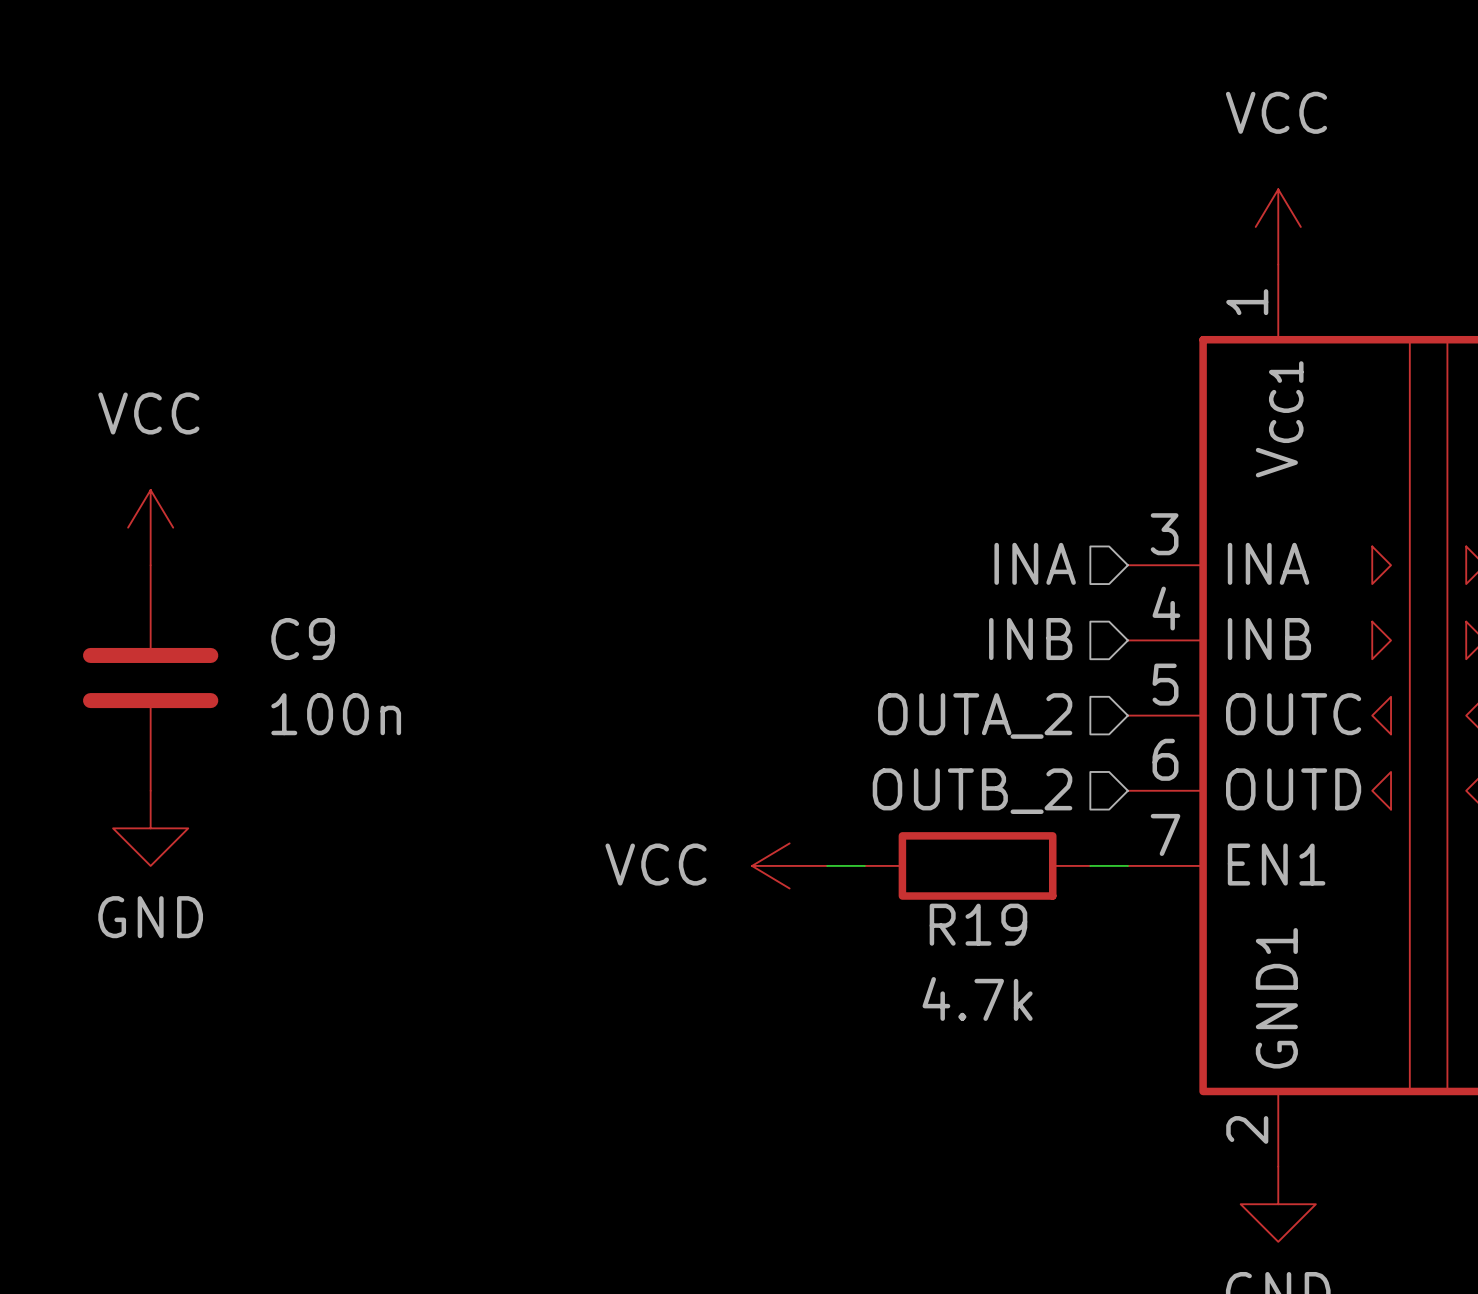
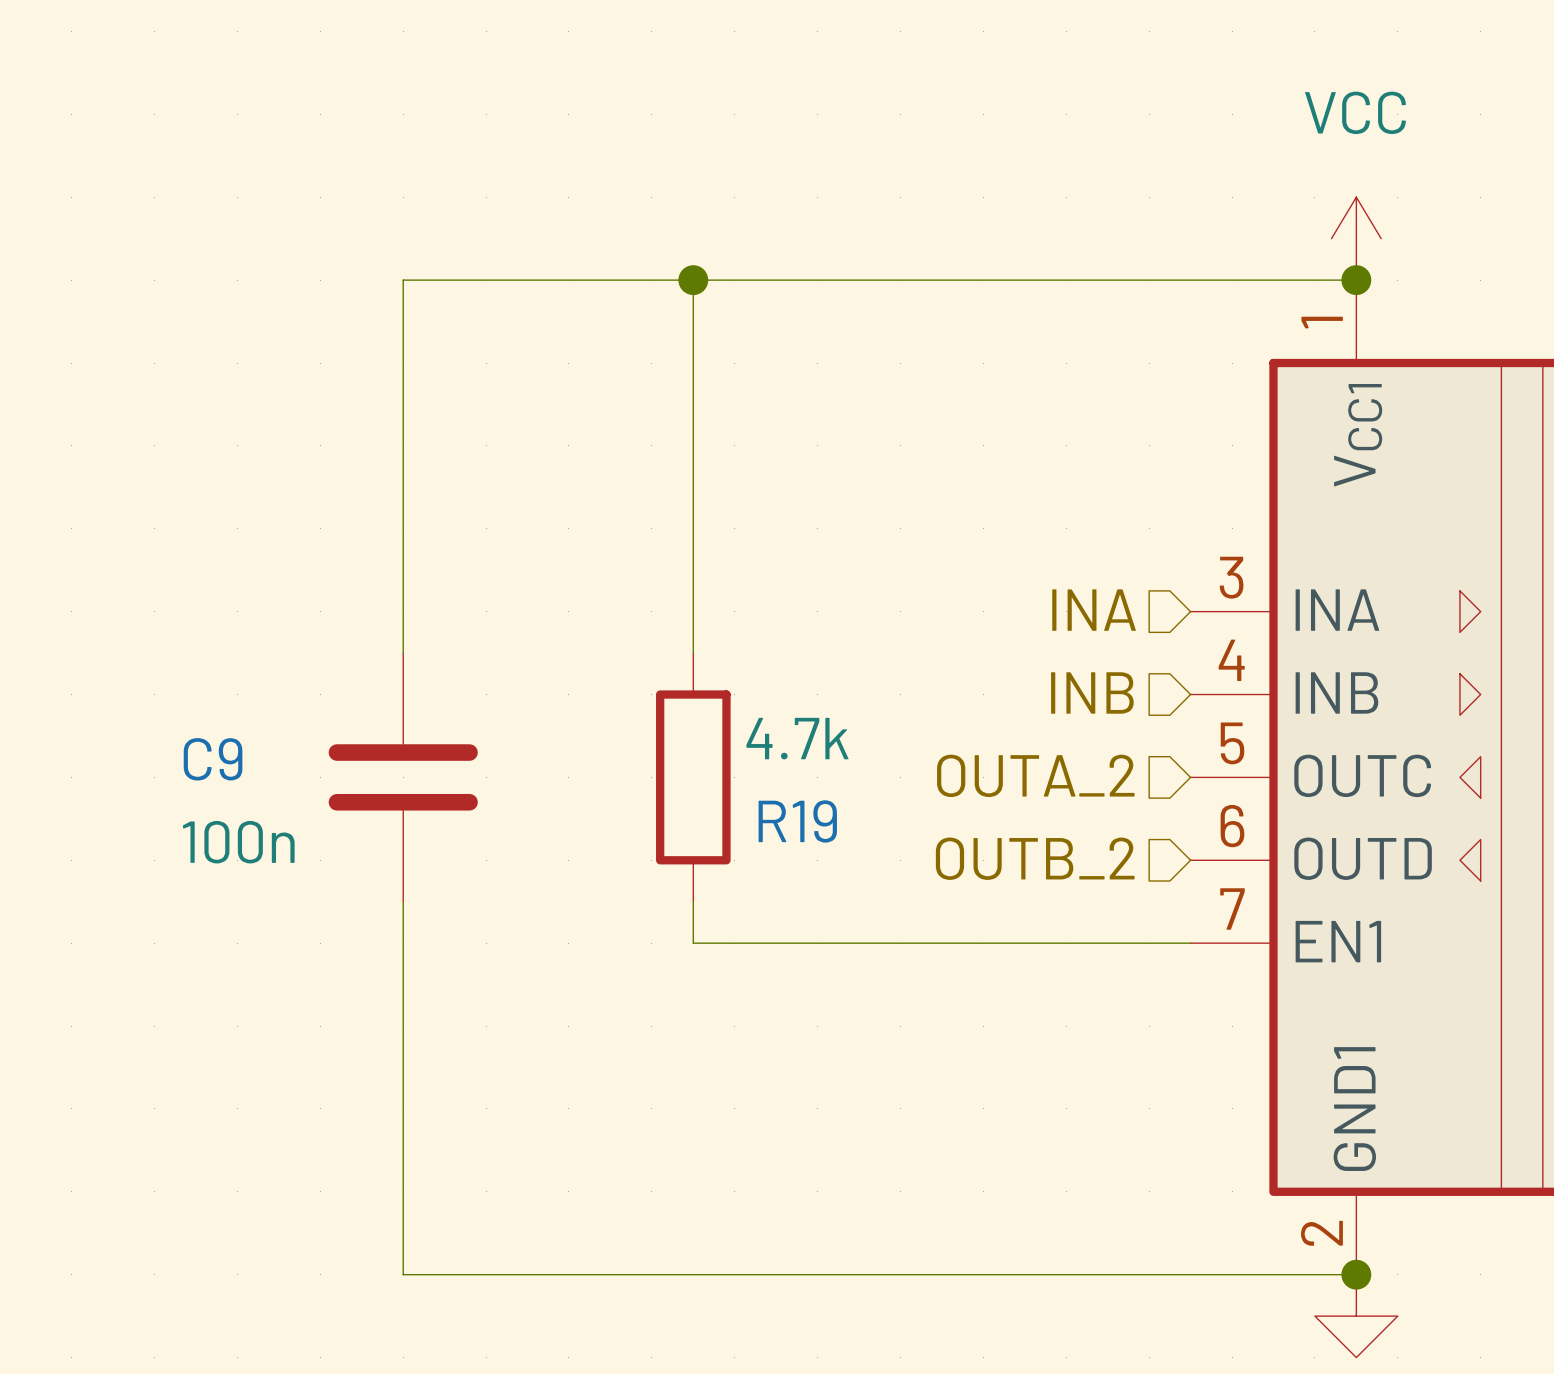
wire: none -> (693, 280) (693, 653)
junction: none -> (693, 280)
wire: none -> (1356, 280) (403, 280) (403, 653)
junction: none -> (1356, 280)
power symbol: VCC (150, 527) -> none
C9 name position: C9 (303, 639) -> C9 (213, 759)
C9 position: (150, 678) -> (403, 777)
C9 value position: 100n (336, 714) -> 100n (238, 842)
power symbol: GND (150, 828) -> none
wire: none -> (403, 901) (403, 1274) (1356, 1274)
wire: none -> (693, 901) (693, 943) (859, 943)
power symbol: VCC (789, 865) -> none
wire: none -> (900, 943) (1149, 943)
R19 rotation: 0° (977, 865) -> 90° clockwise (693, 777)
R19 position: (977, 865) -> (693, 777)
R19 name position: R19 (978, 924) -> R19 (797, 821)
R19 value position: 4.7k (977, 998) -> 4.7k (797, 738)
junction: none -> (1356, 1274)

